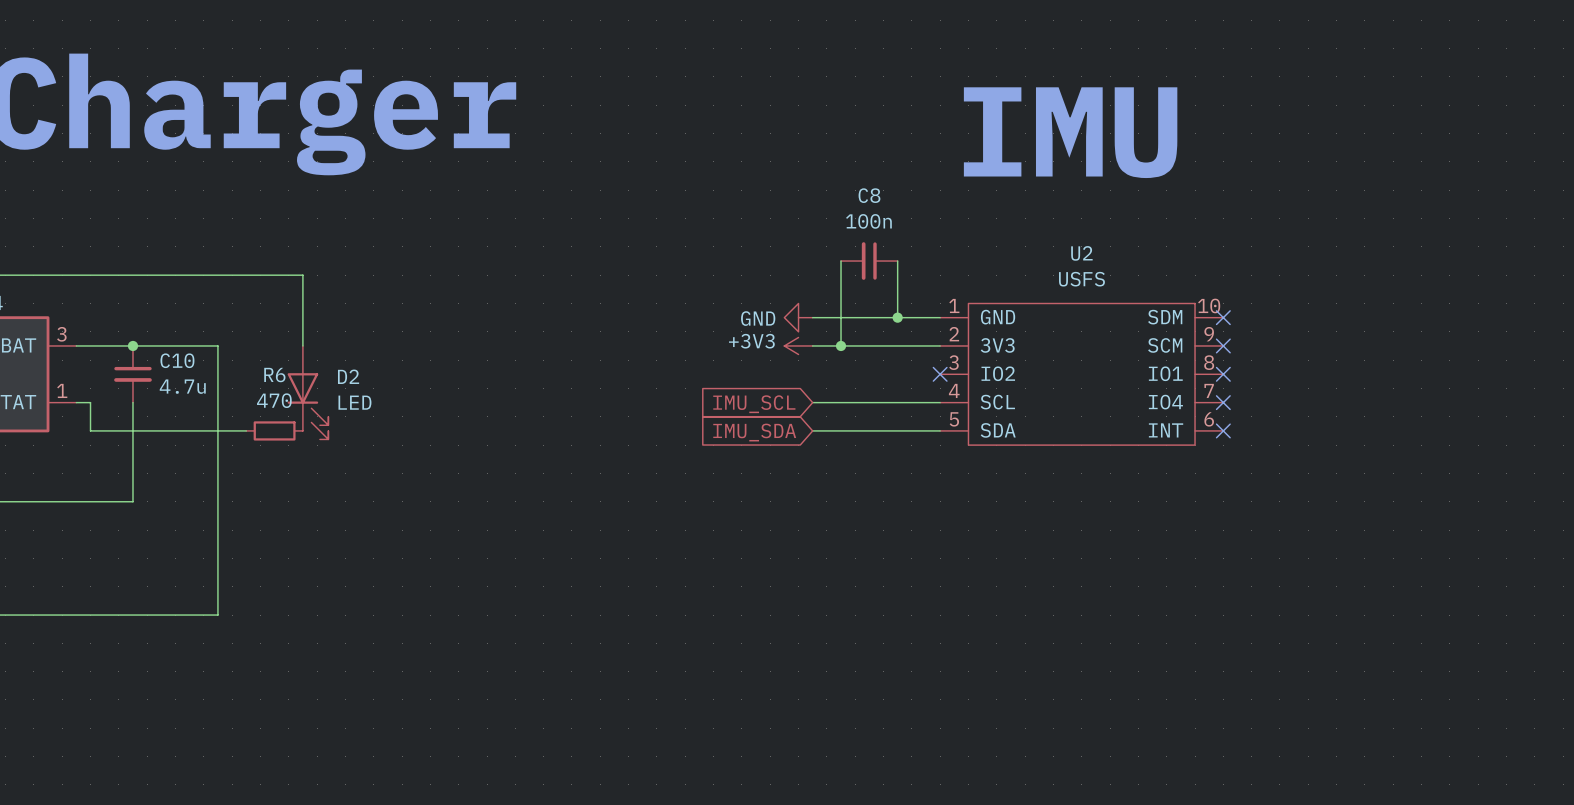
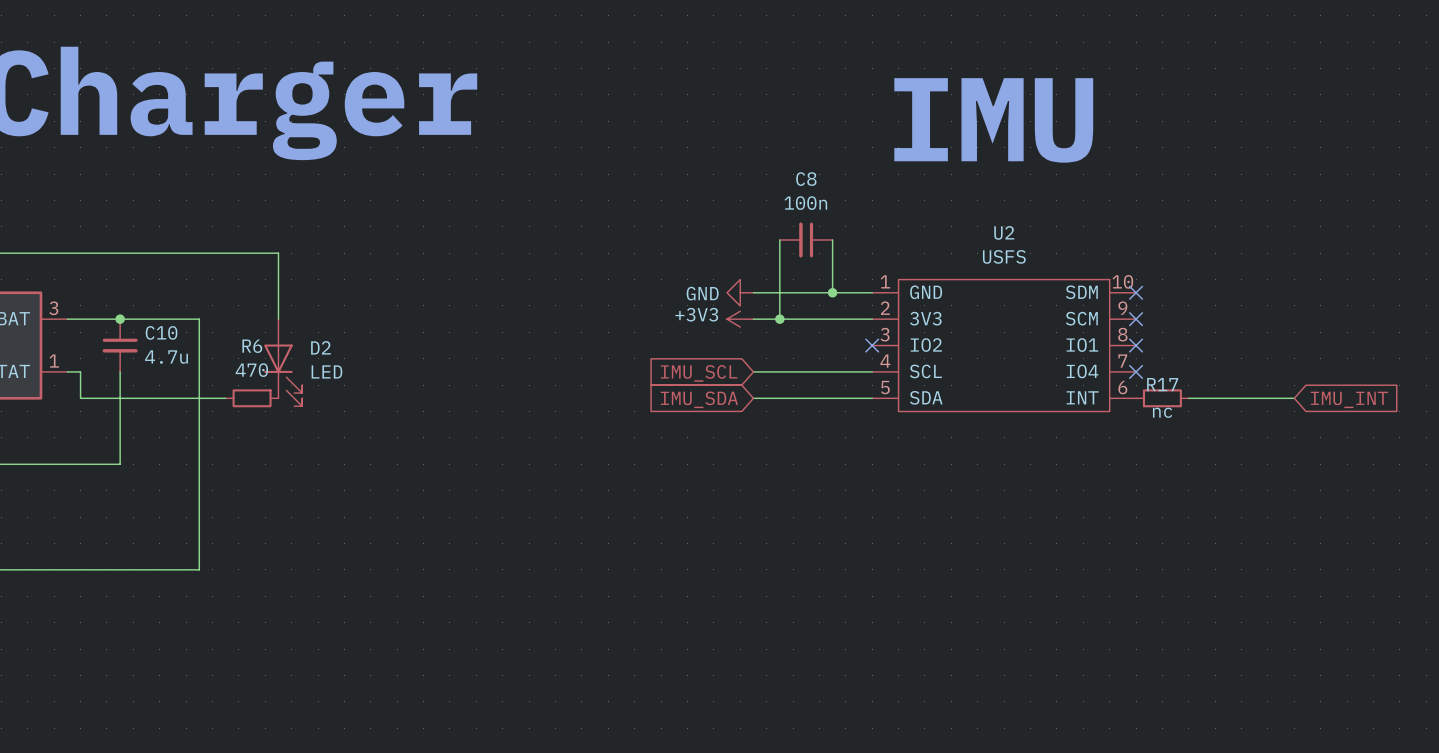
no-connect mark: (1223, 430) -> none
R17: none -> nc (1162, 398)
wire: none -> (1188, 398) (1294, 398)
global label: none -> IMU_INT (1349, 399)

